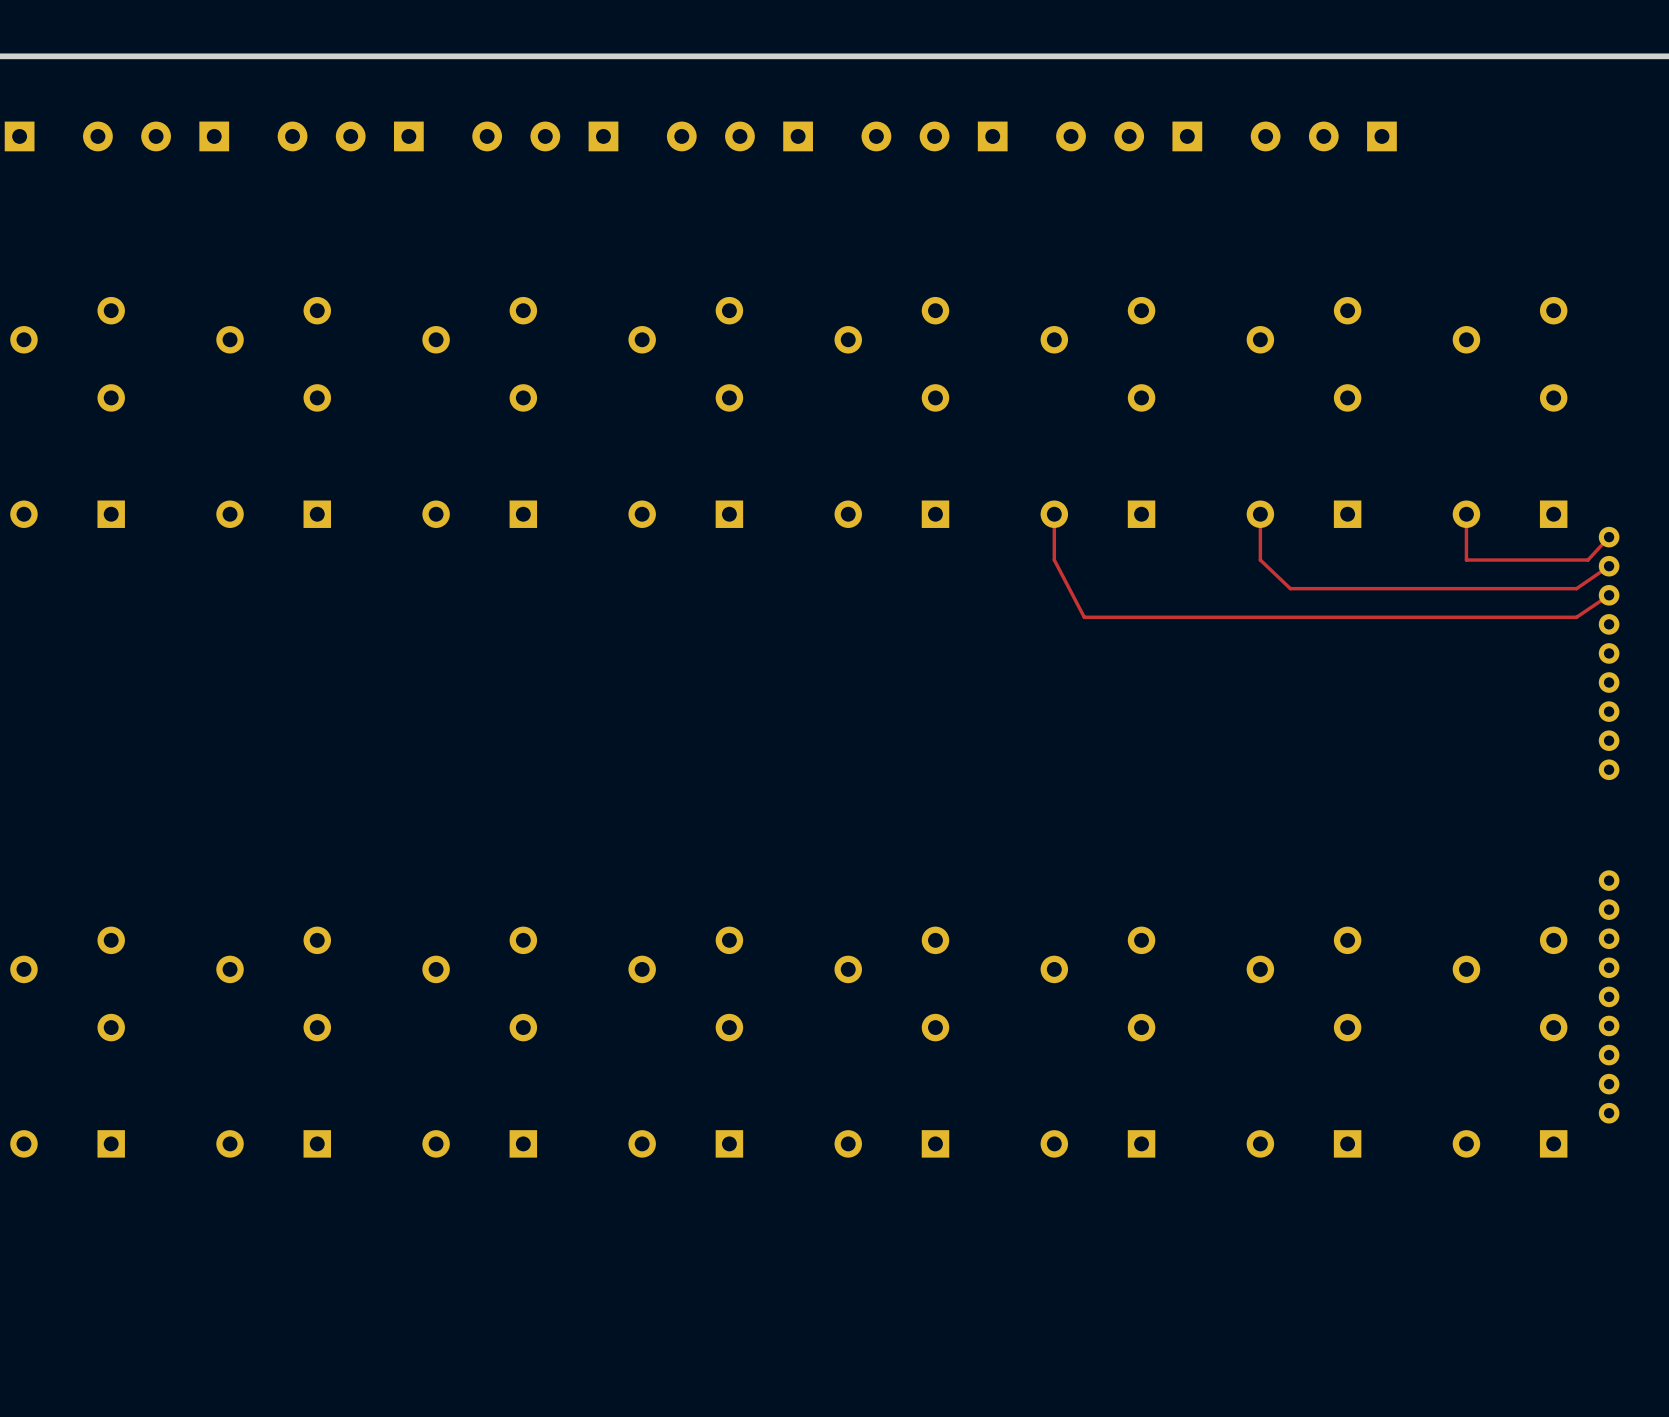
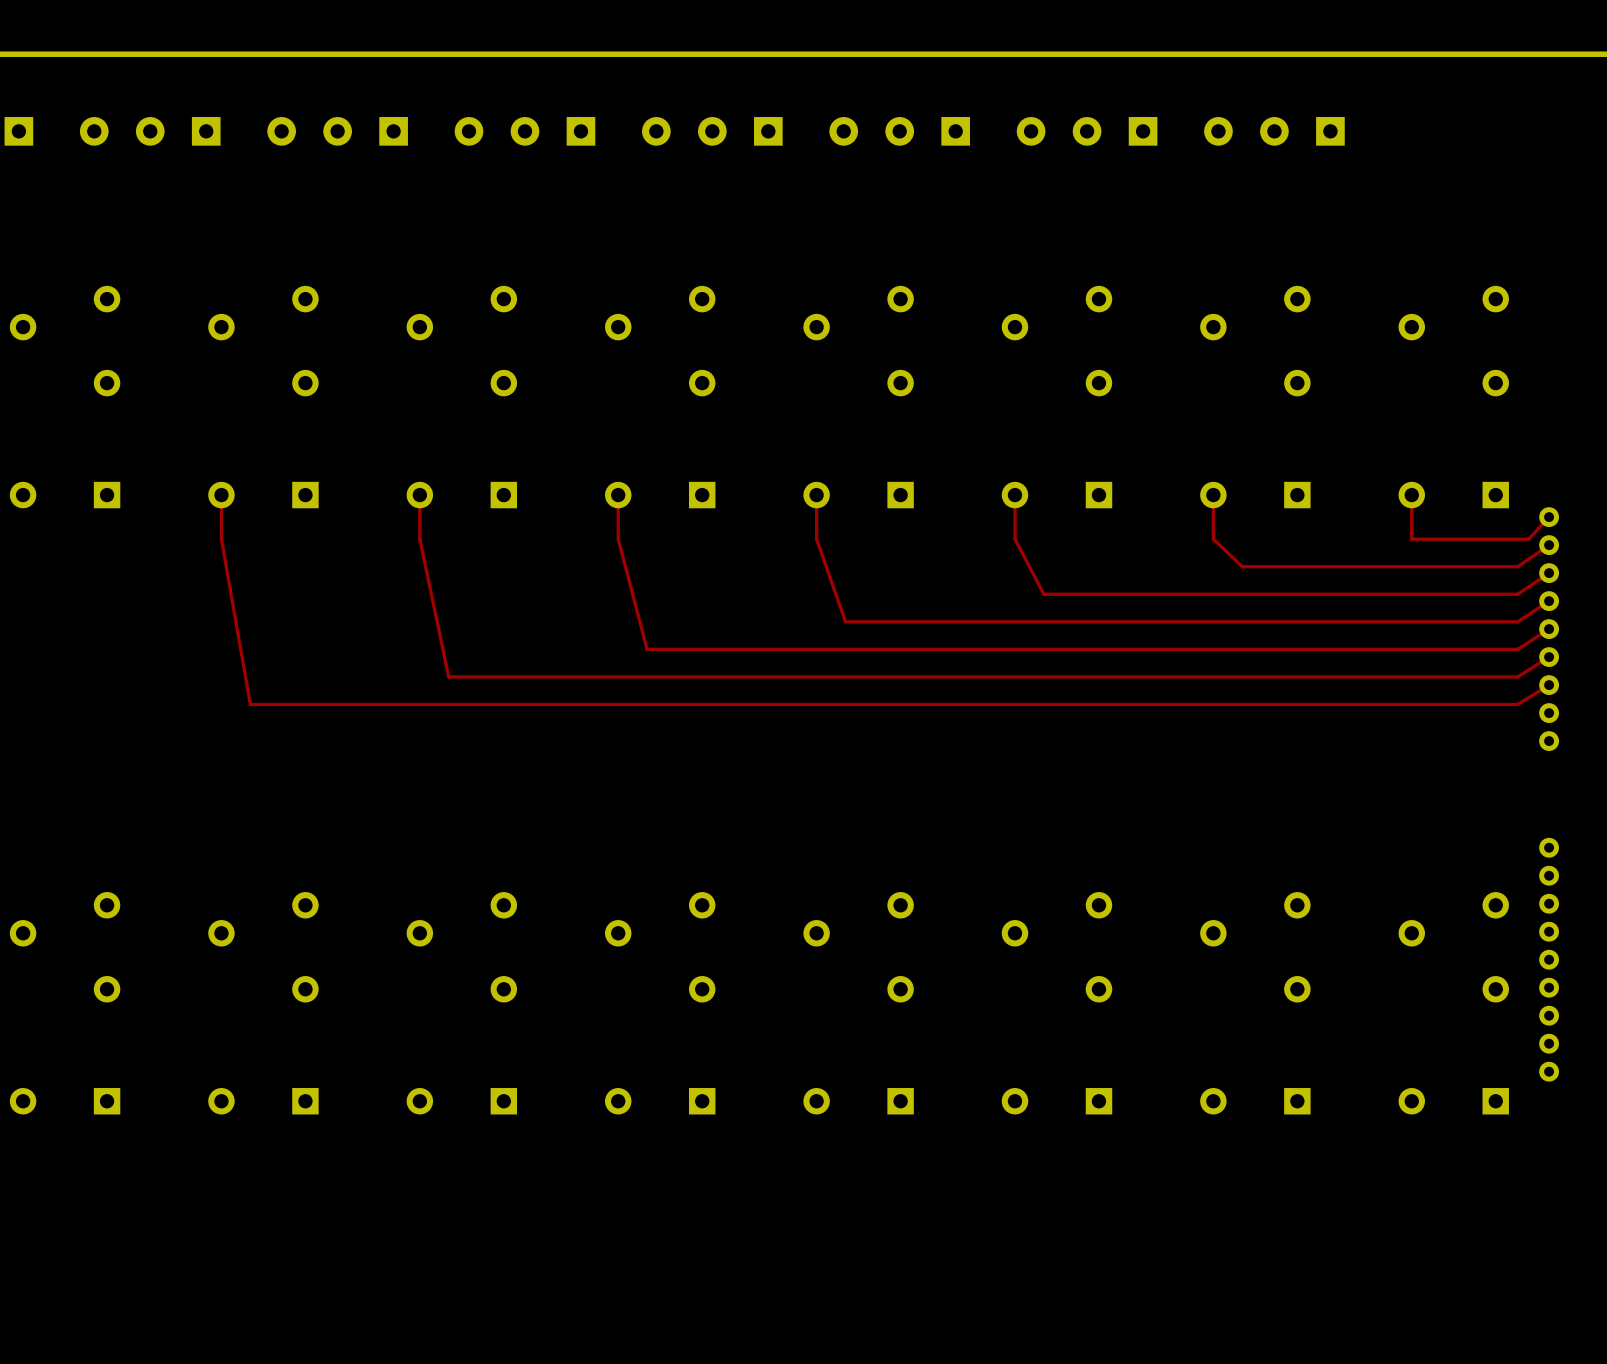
top track: none -> (221, 495) (221, 539) (250, 704) (1517, 704) (1549, 685)
top track: none -> (419, 495) (419, 539) (448, 676) (1517, 676) (1549, 657)
top track: none -> (618, 495) (618, 539) (647, 649) (1517, 649) (1549, 629)
top track: none -> (816, 495) (816, 539) (845, 621) (1517, 621) (1549, 601)

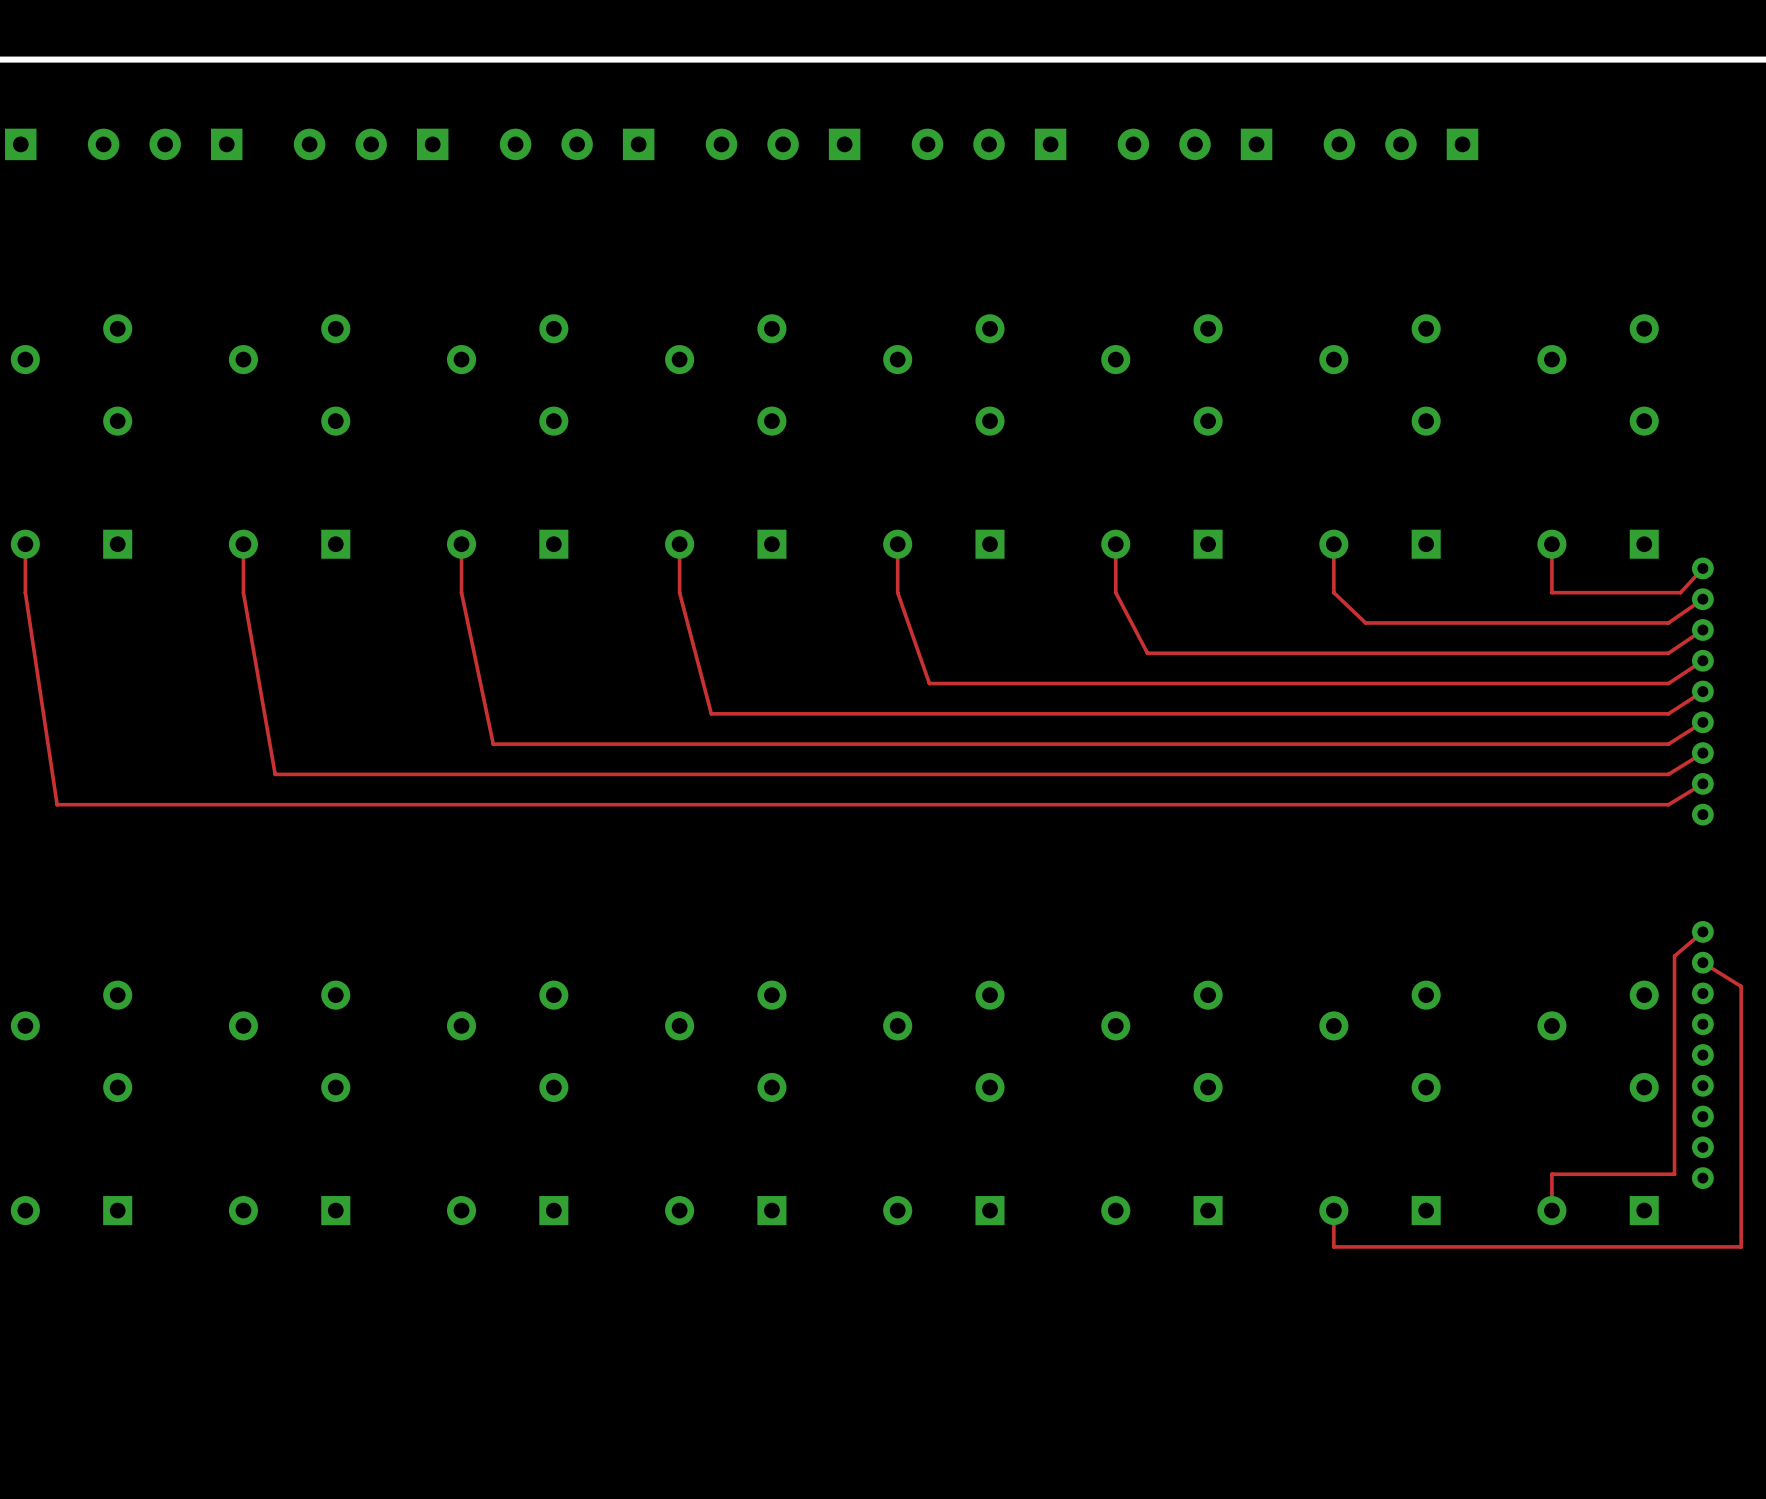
top track: none -> (25, 544) (25, 592) (57, 804) (1668, 804) (1702, 783)
top track: none -> (1702, 931) (1674, 956) (1674, 1174) (1551, 1174) (1551, 1210)
top track: none -> (1702, 962) (1741, 986) (1741, 1246) (1333, 1246) (1333, 1210)

